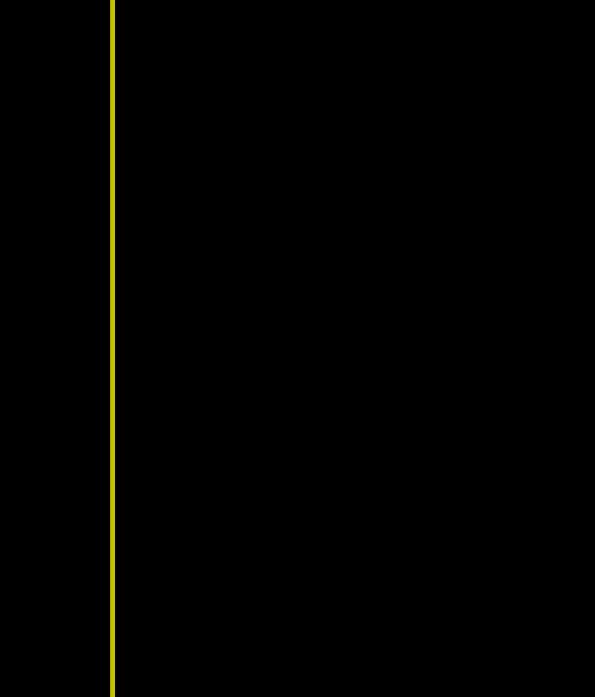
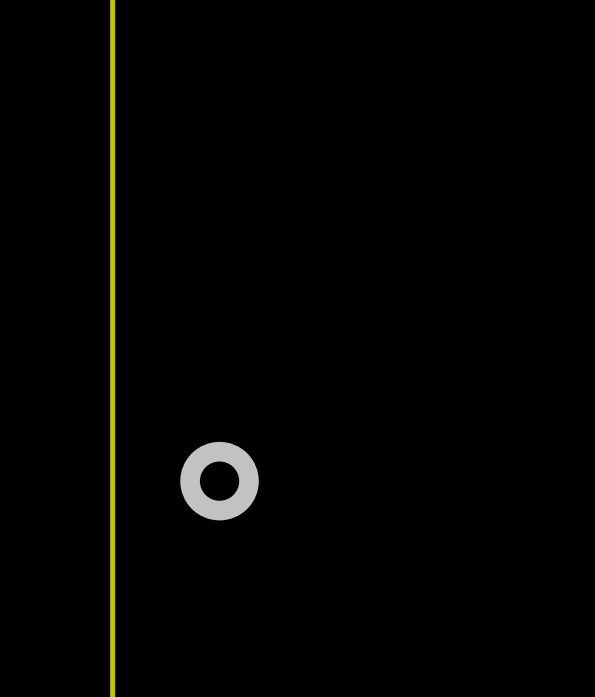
via: none -> (219, 481)

